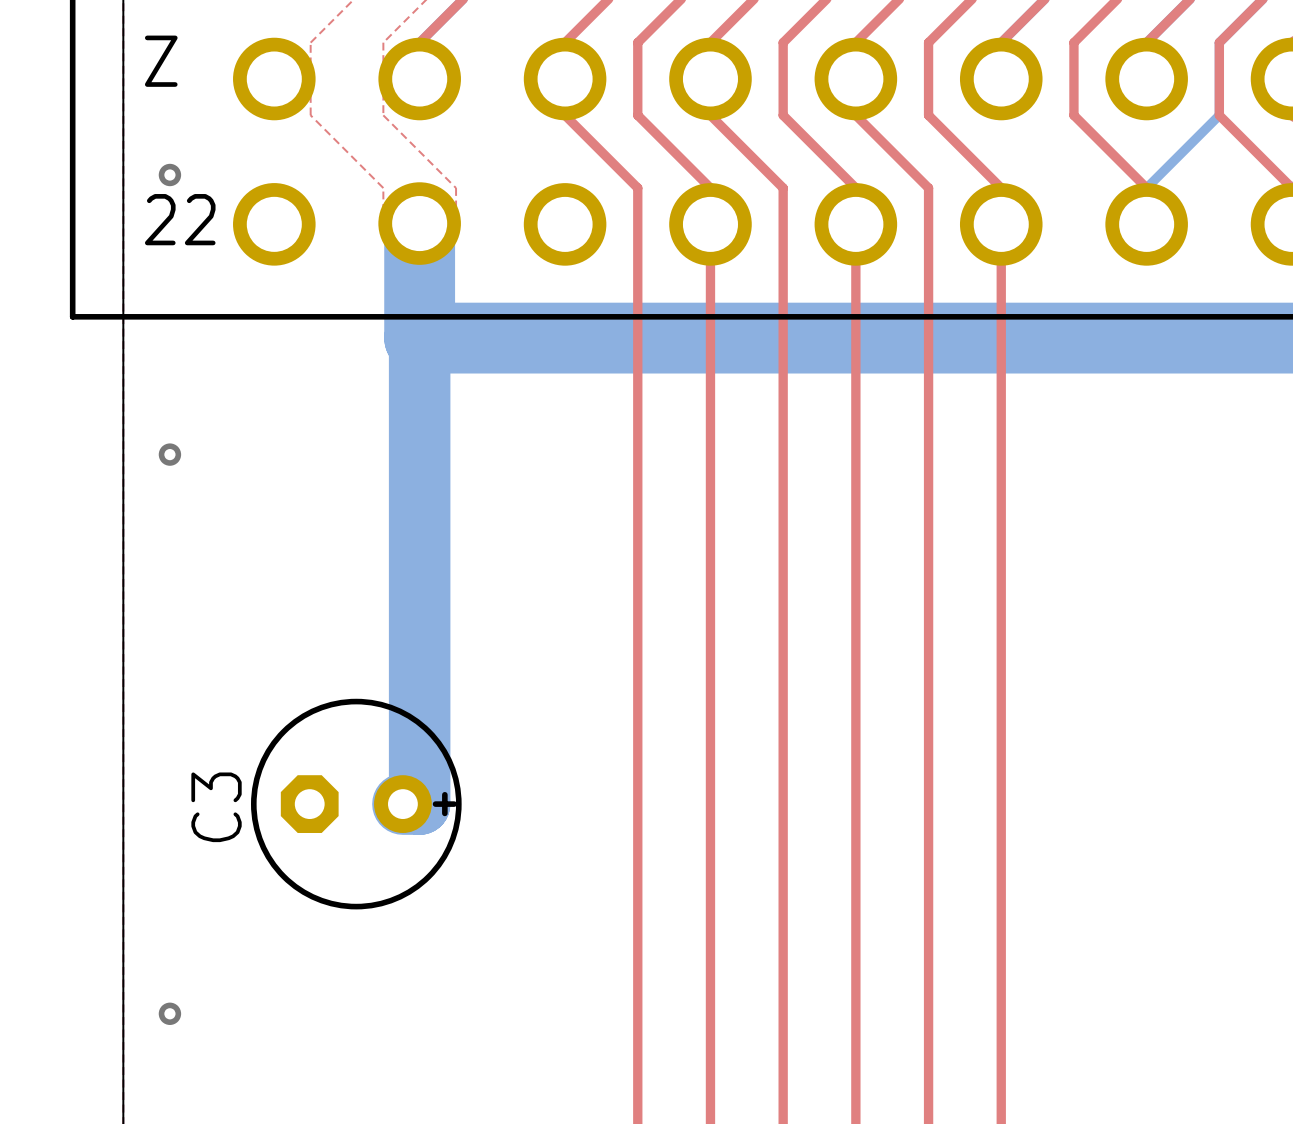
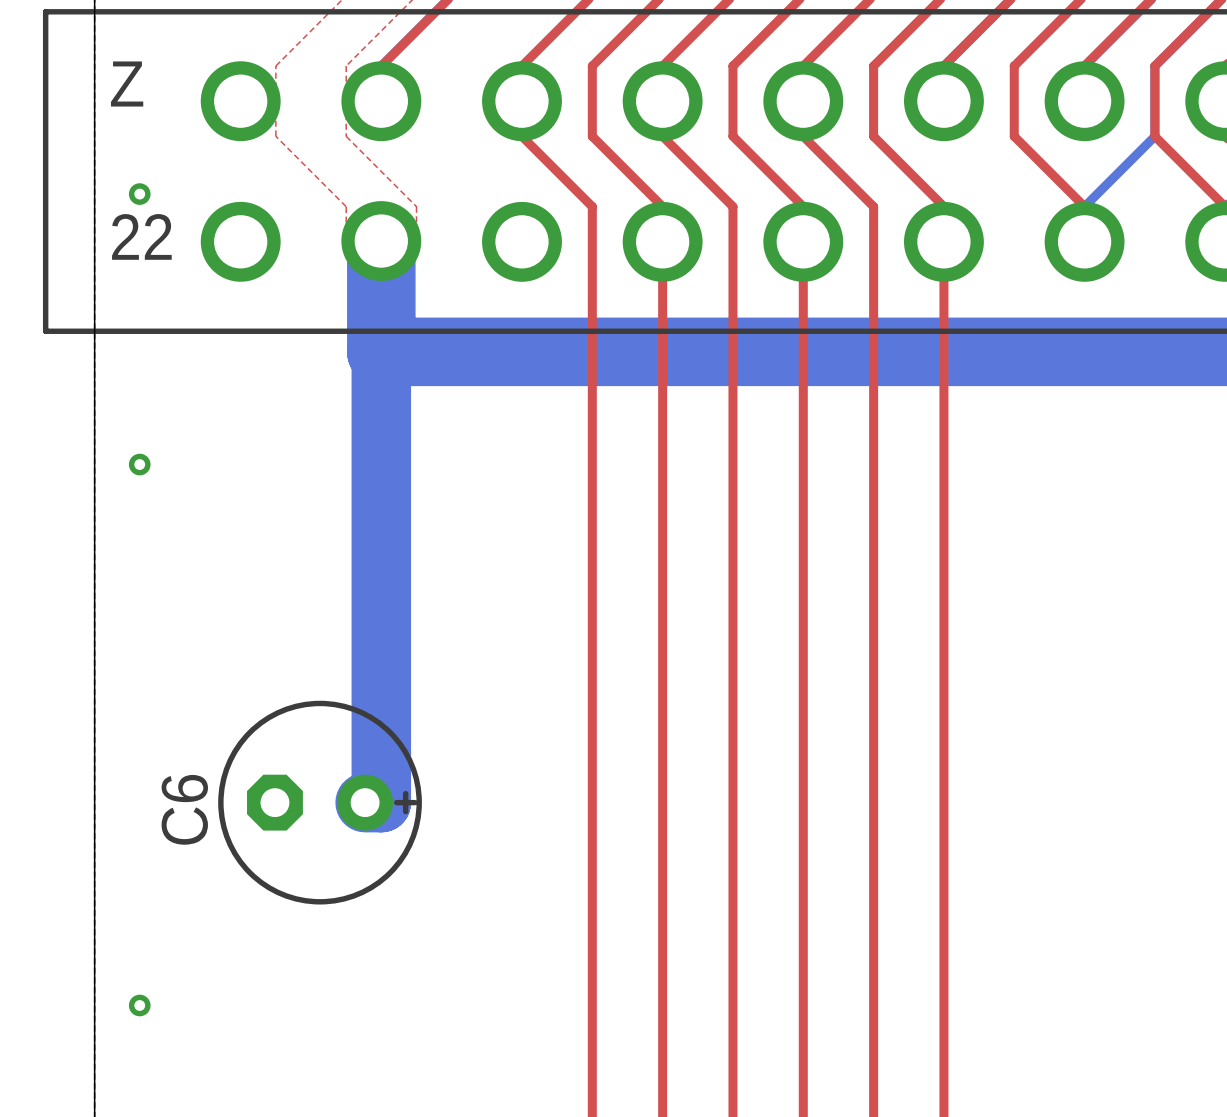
C3 name: C3 (216, 807) -> C6 (184, 809)

